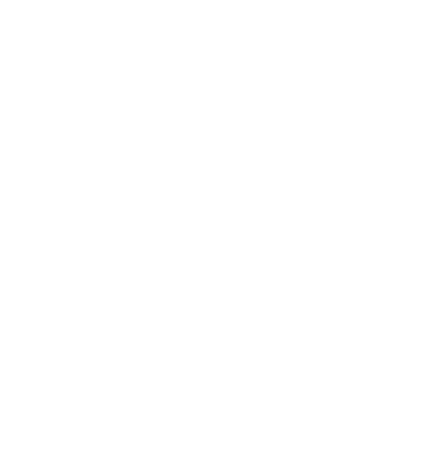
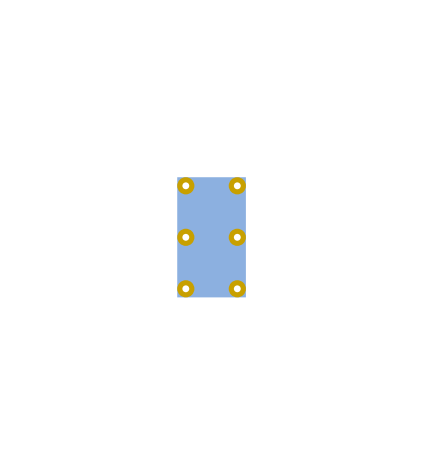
part: none -> (211, 237)

